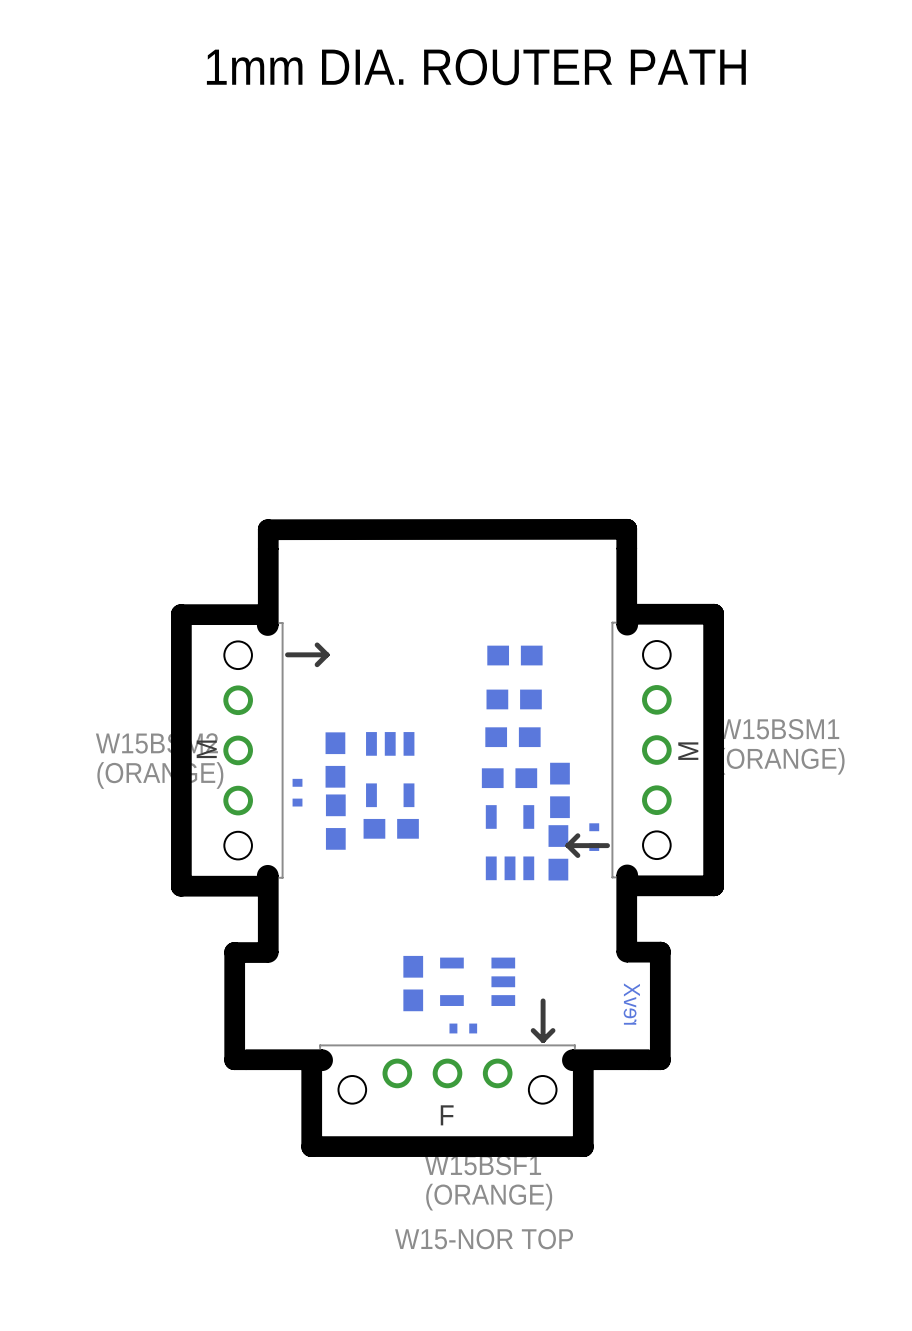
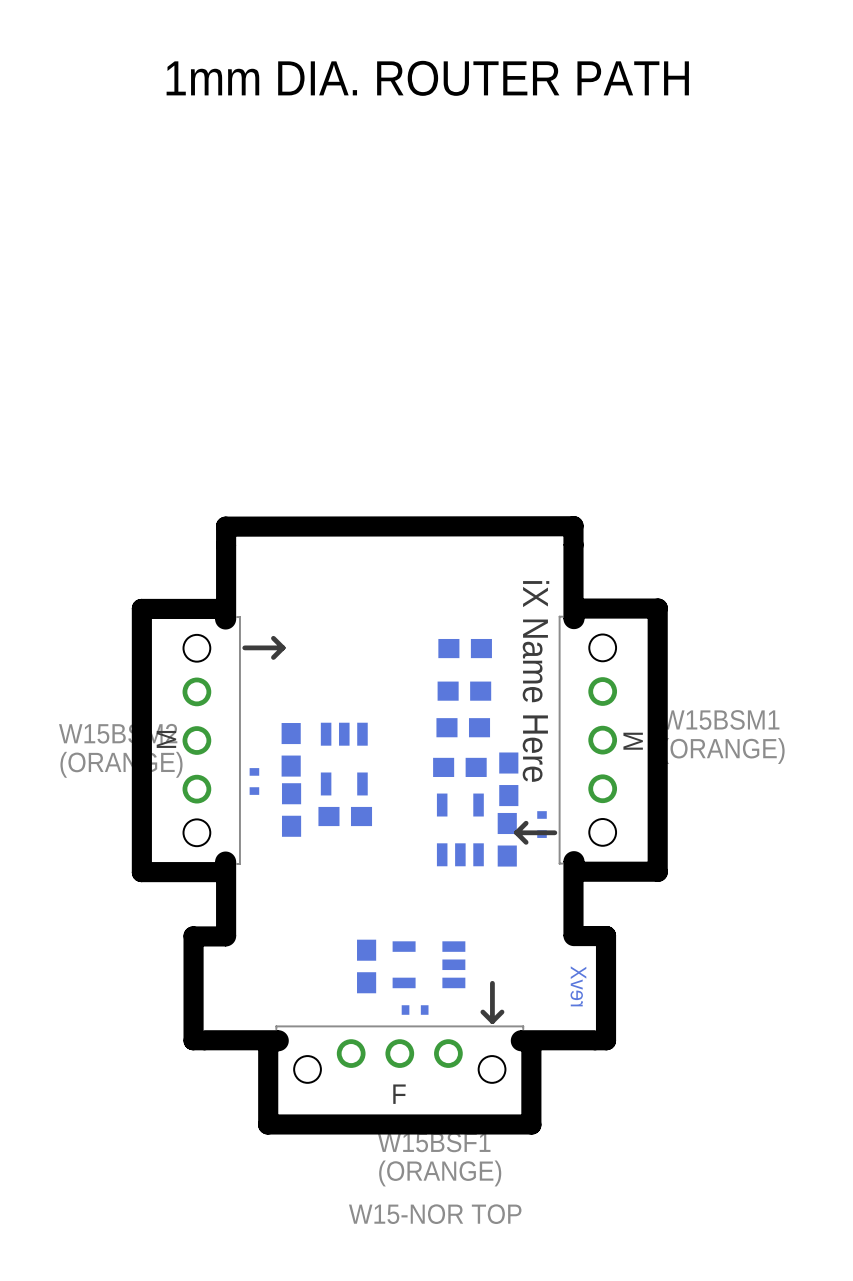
text: none -> iX Name Here (535, 681)

